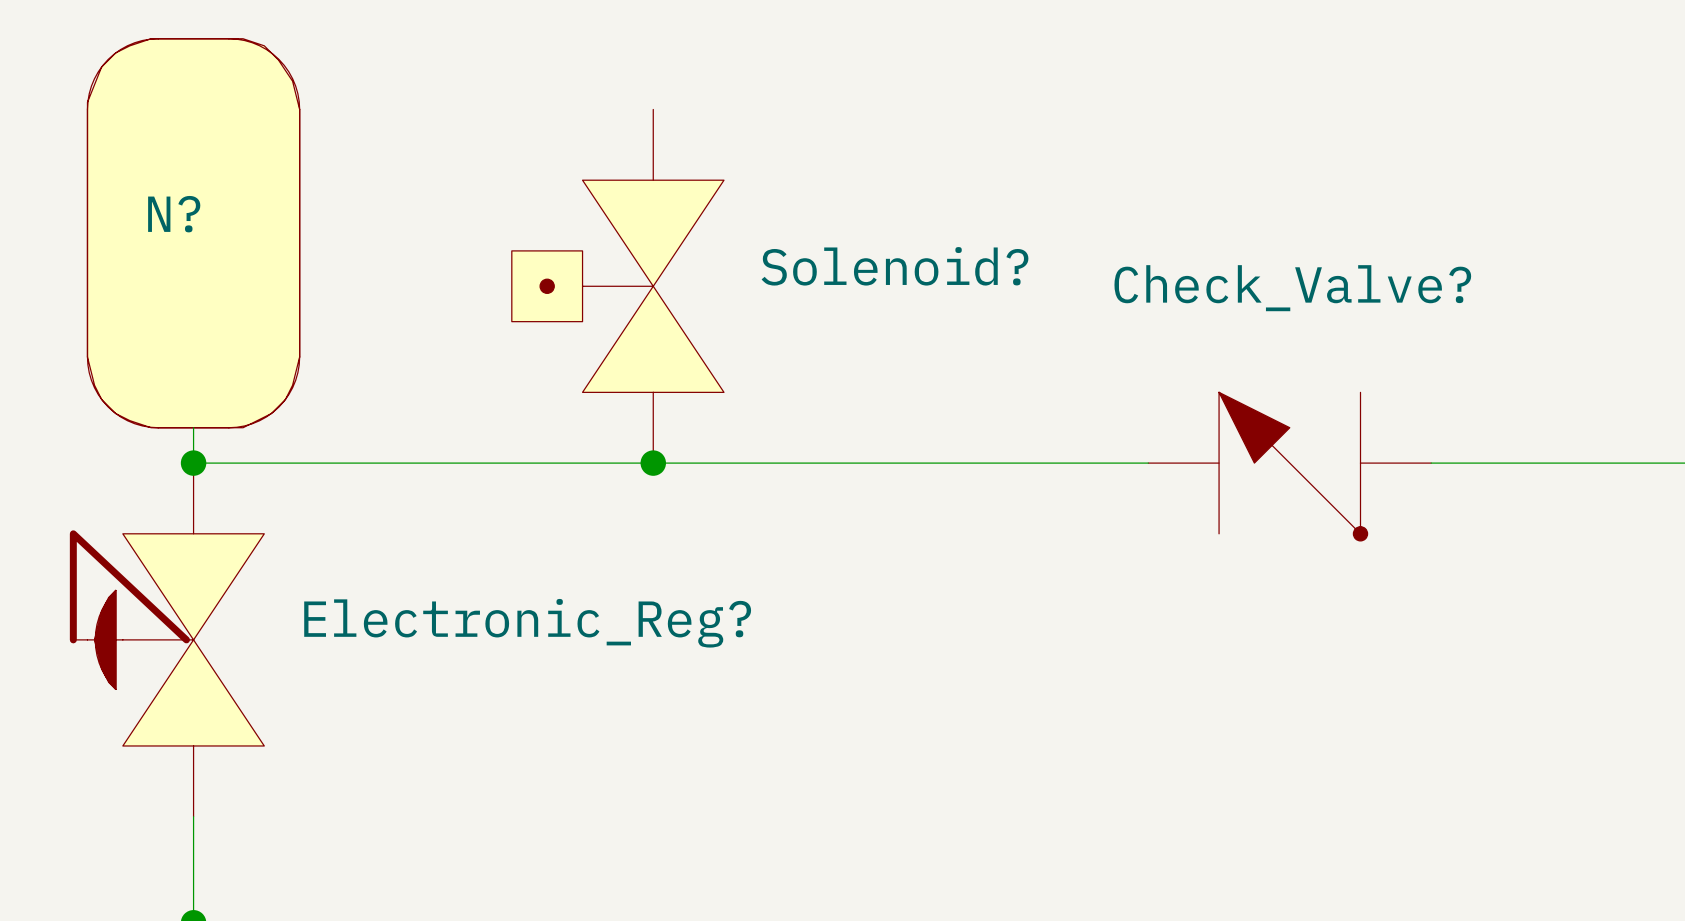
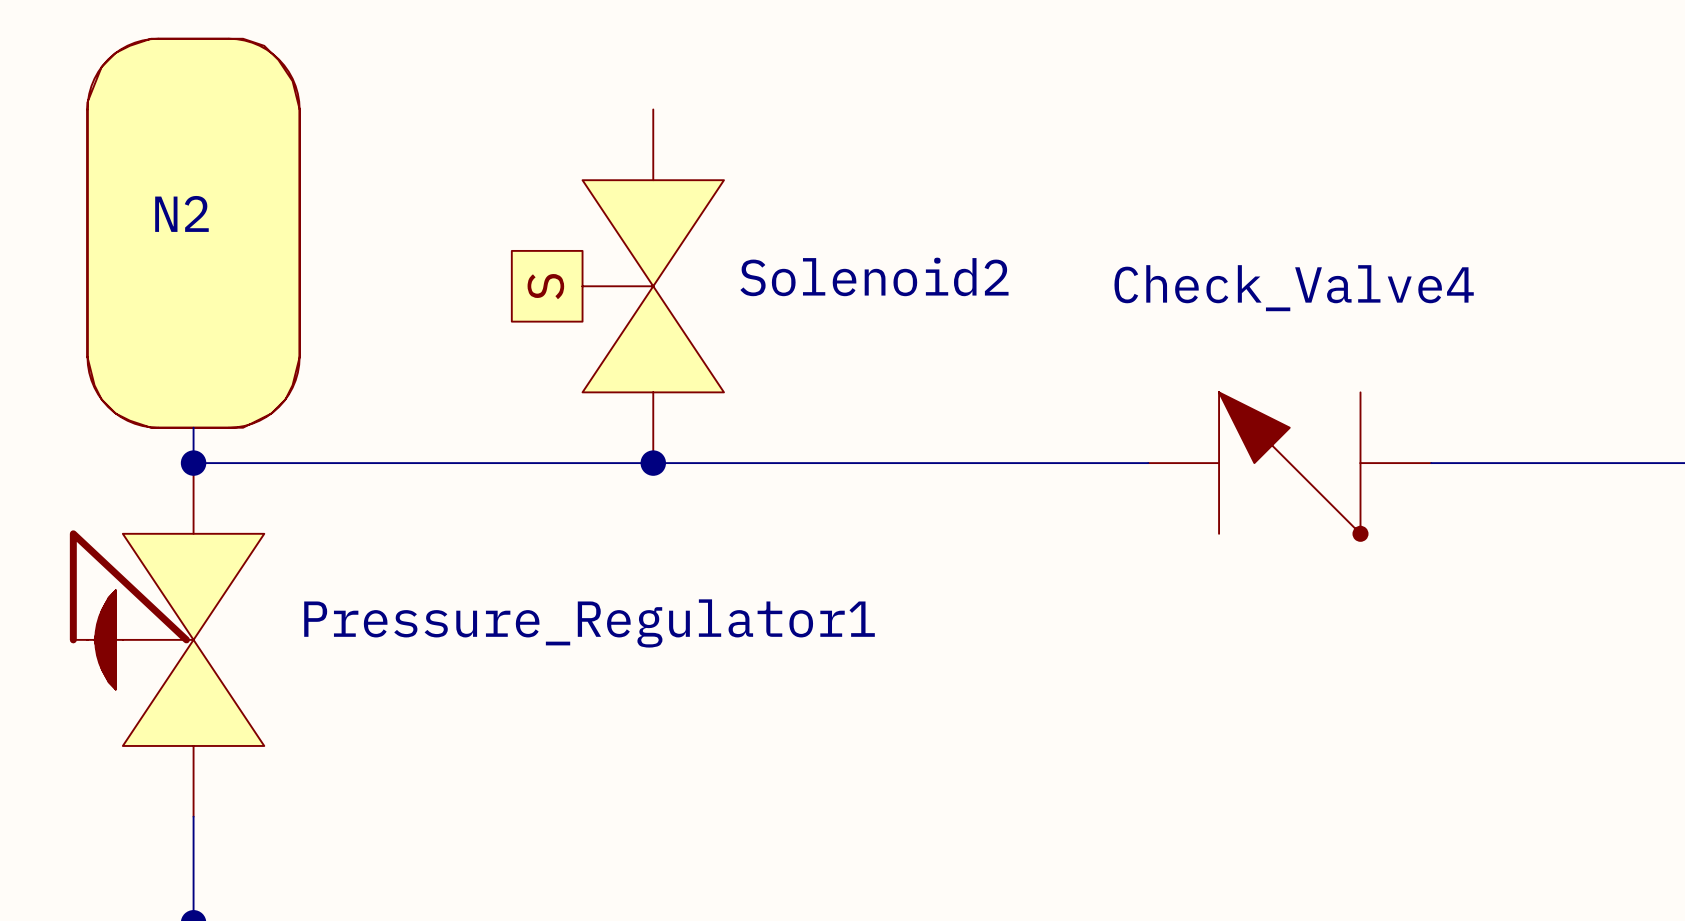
N? name: N? (174, 214) -> N2 (181, 213)
Solenoid?: (617, 286) -> none
Solenoid2: none -> (617, 286)
Check_Valve? name: Check_Valve? (1292, 288) -> Check_Valve4 (1294, 288)
Electronic_Reg? name: Electronic_Reg? (527, 623) -> Pressure_Regulator1 (589, 623)

